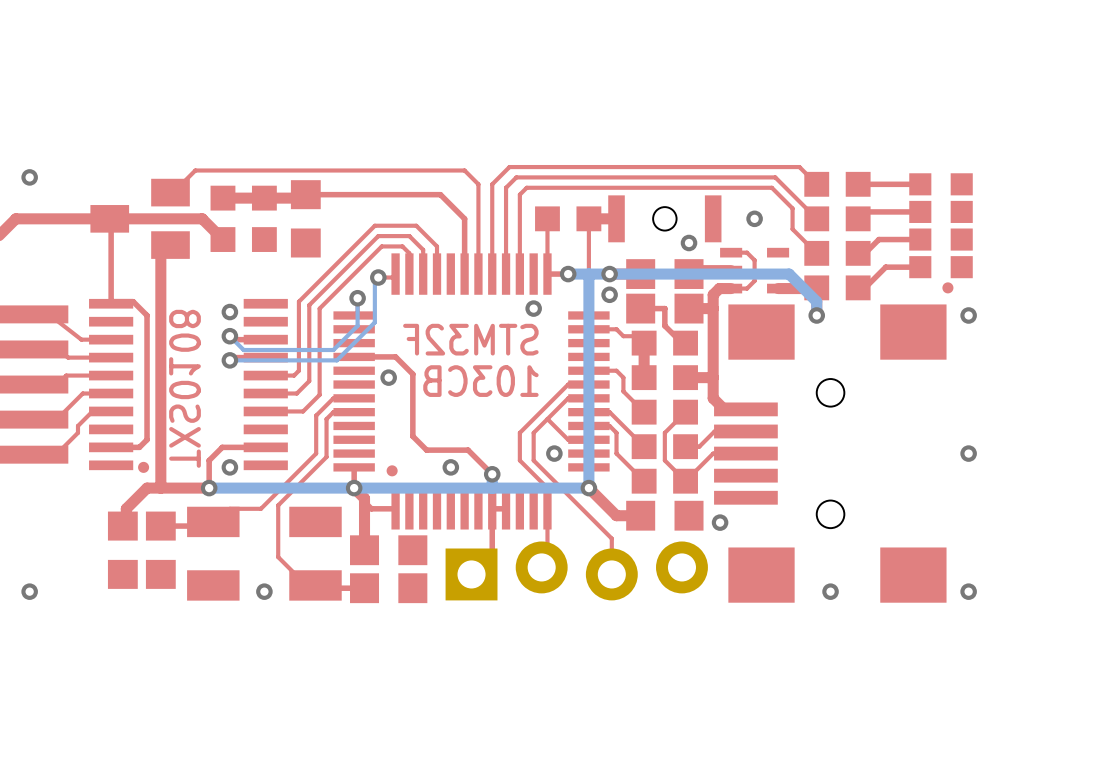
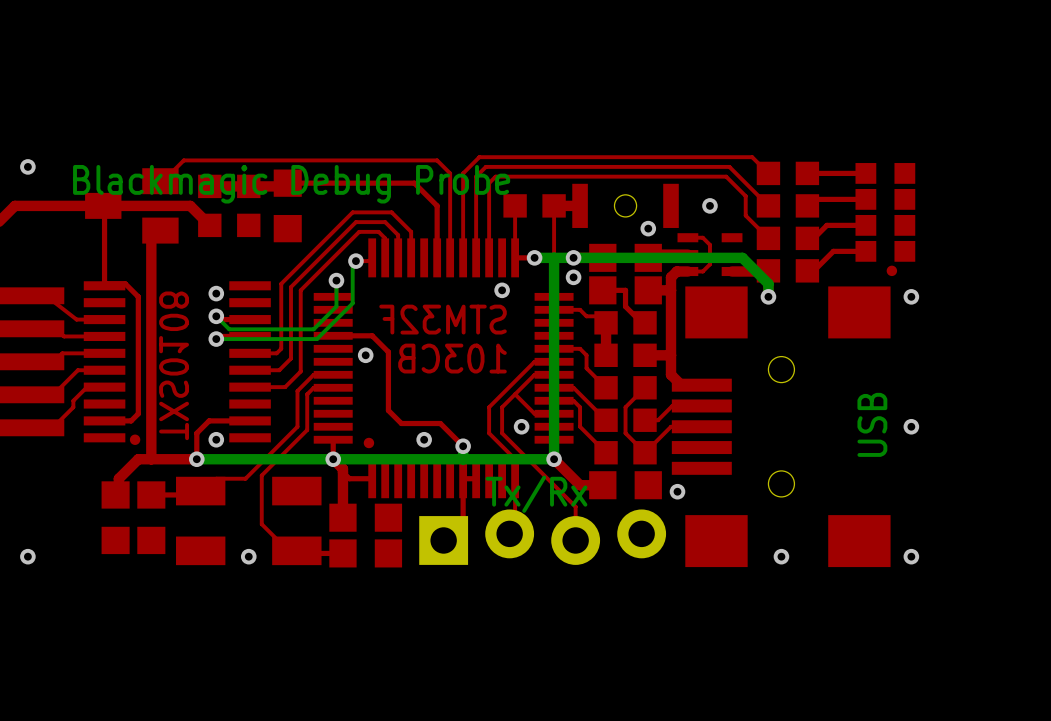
text: none -> Blackmagic Debug Probe (291, 184)
text: none -> USB (872, 424)
text: none -> Tx/Rx (536, 494)

